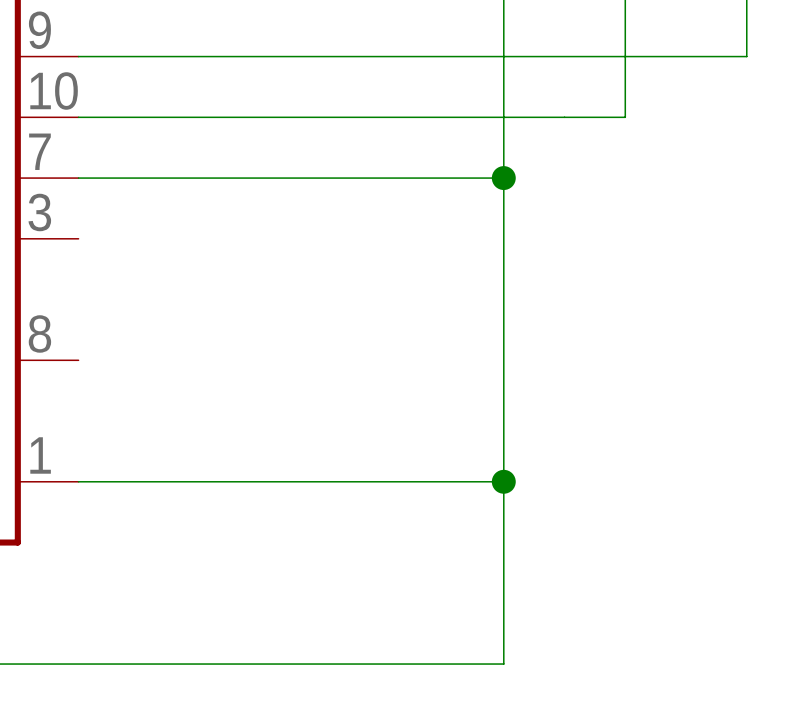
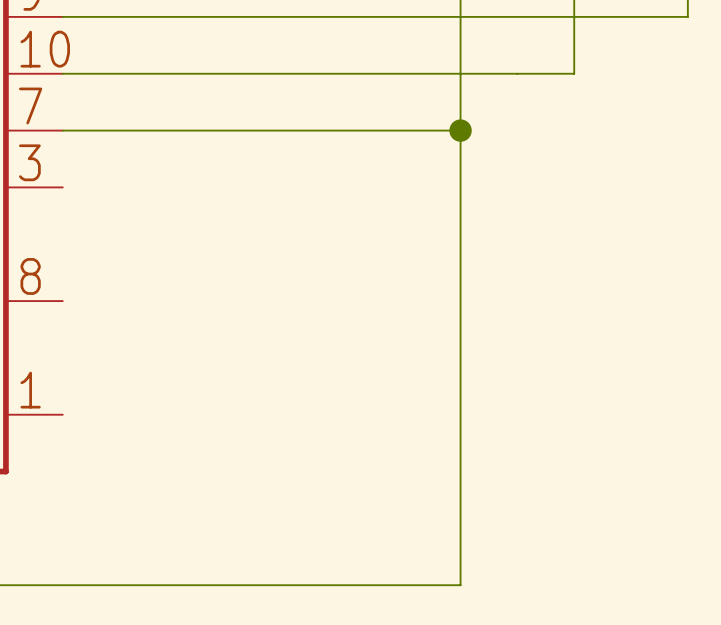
wire: (78, 481) (503, 481) -> none
junction: (503, 481) -> none

